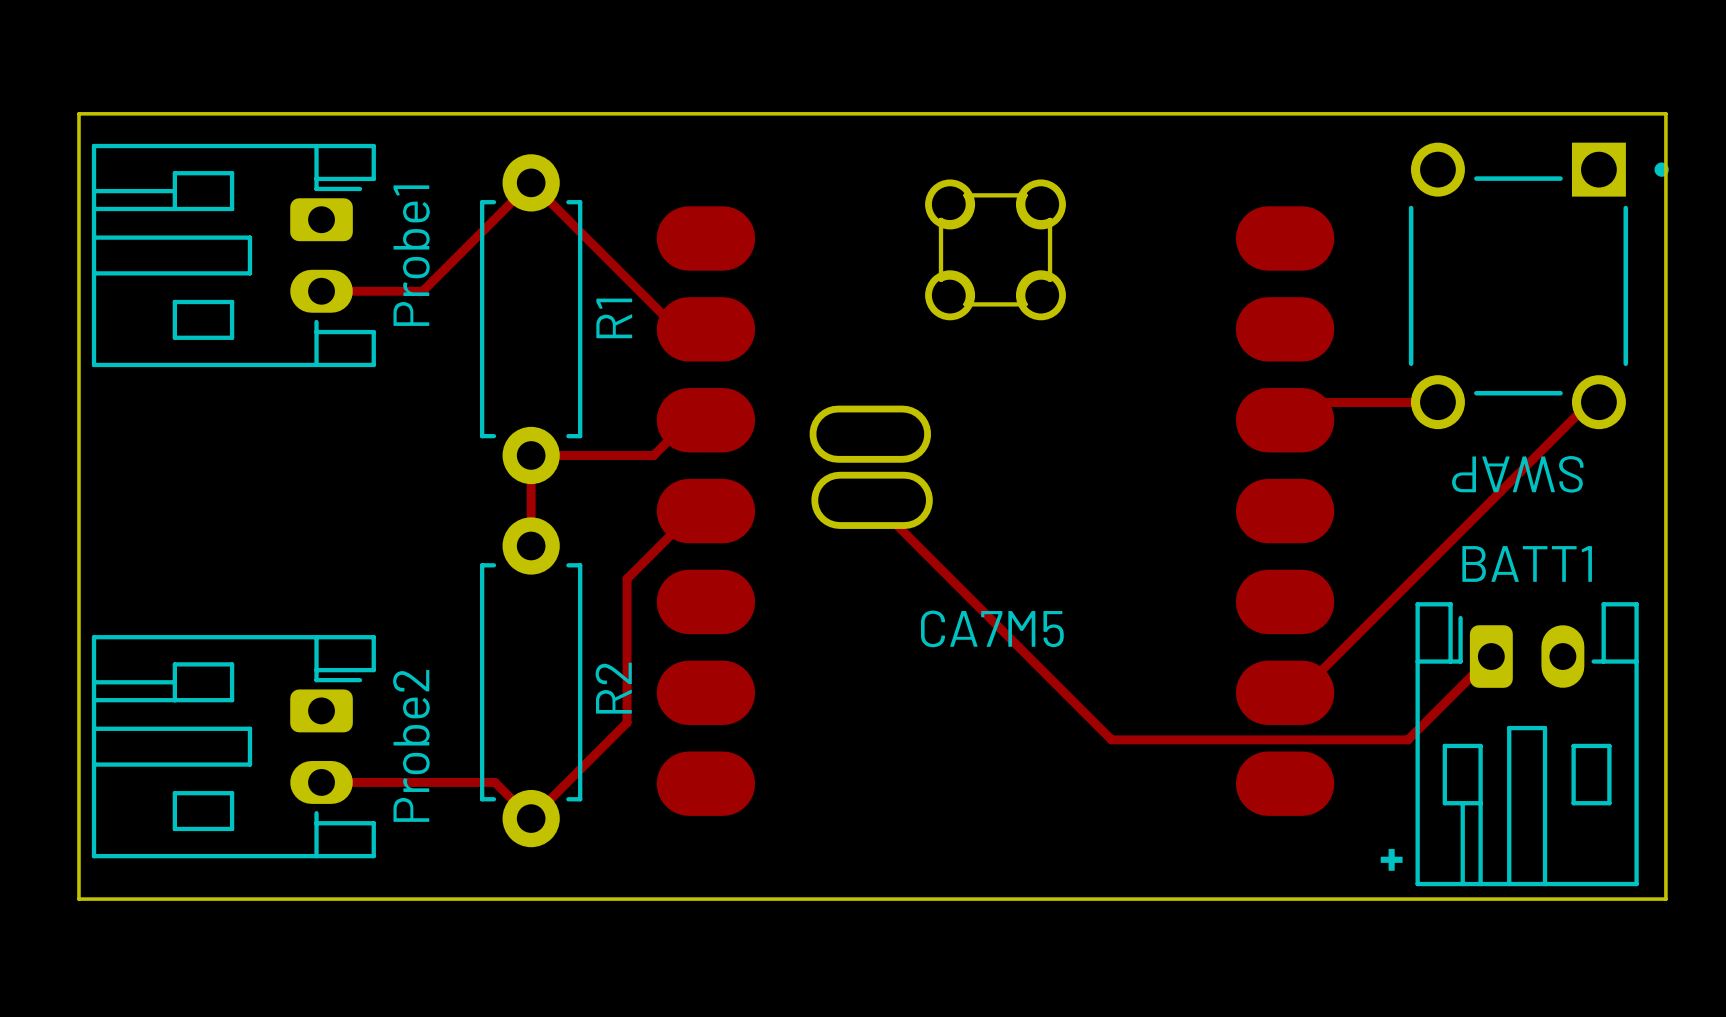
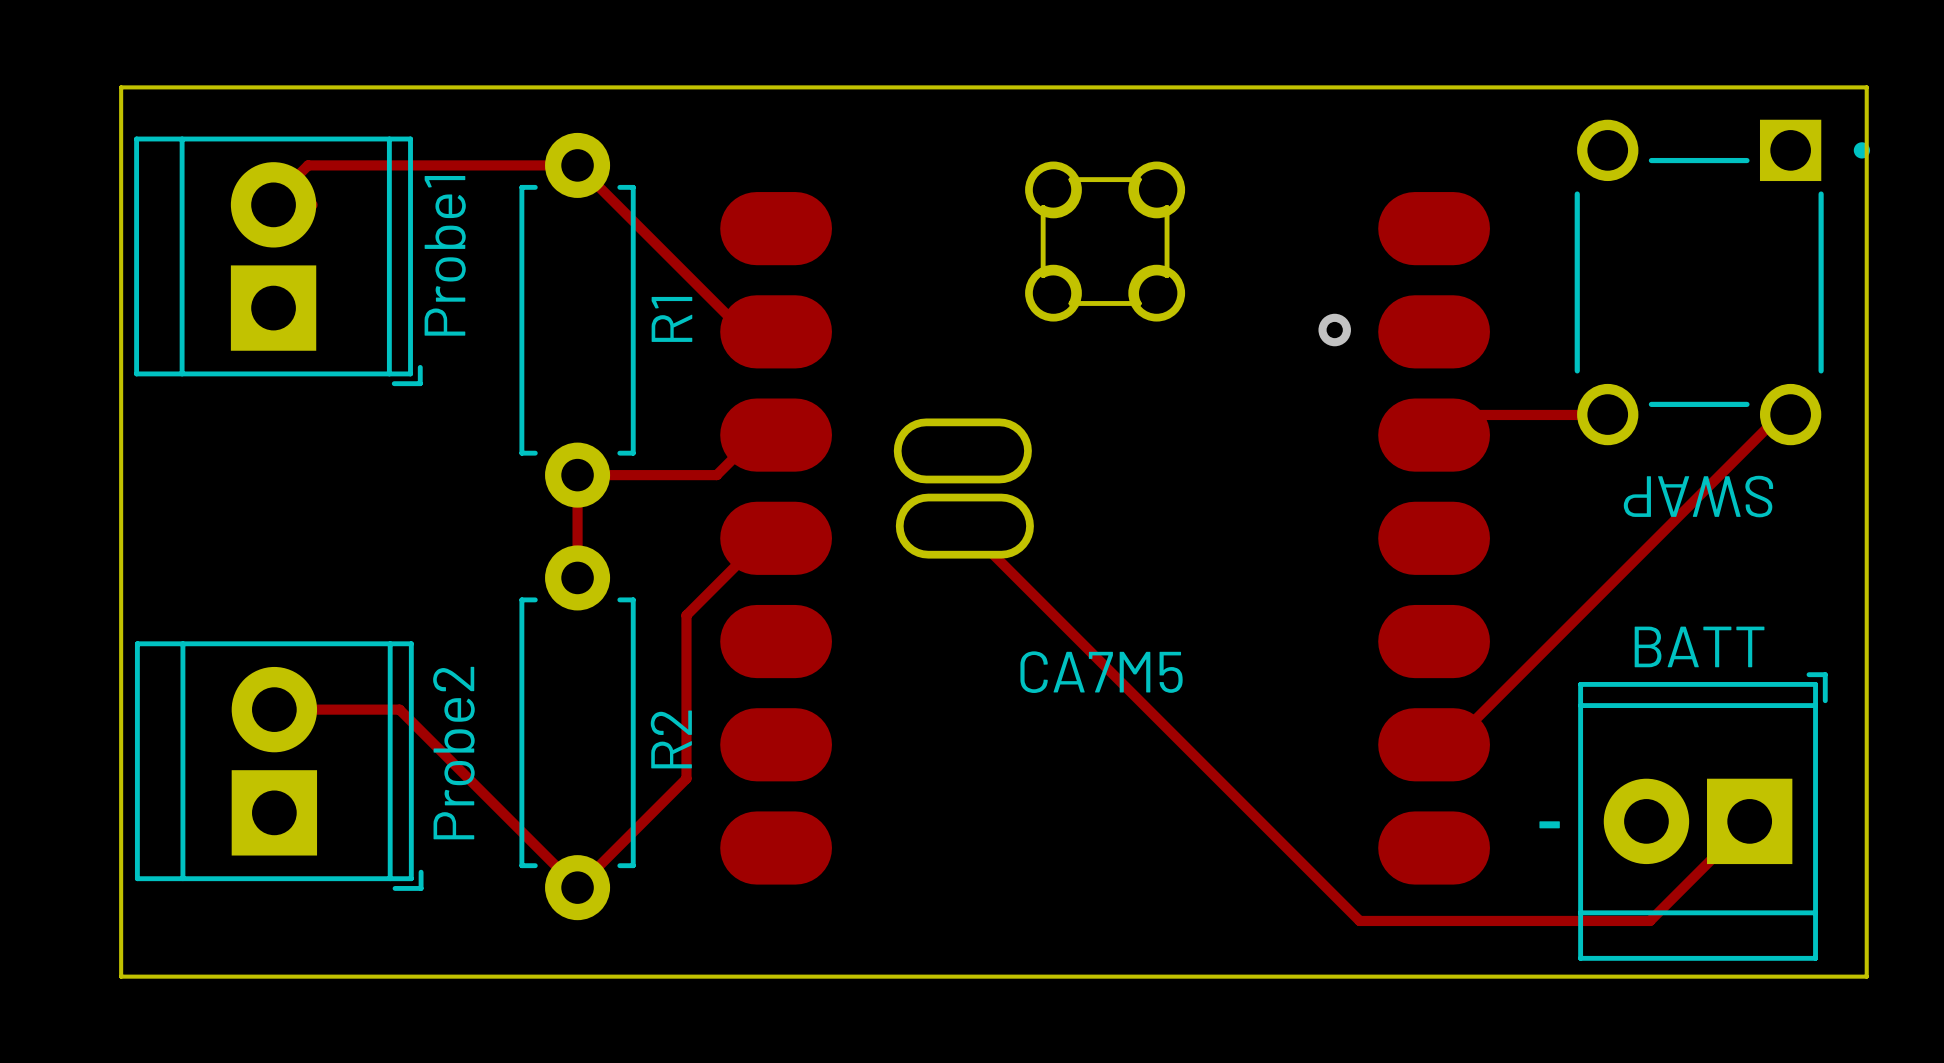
board edge: (1665, 113) (78, 113) (78, 899) (1665, 899) (1665, 896) -> (1866, 87) (121, 87) (121, 976) (1866, 976)
Probe1 footprint: [91, 143, 376, 368] -> [134, 136, 423, 387]
track: (531, 182) (422, 291) (321, 291) -> (577, 165) (308, 165) (272, 201)
via: none -> (1334, 330)
Probe2 footprint: [91, 635, 376, 859] -> [134, 641, 424, 891]
track: (1491, 656) (1407, 739) (1111, 739) -> (1749, 821) (1650, 920) (1359, 920) (1236, 798)
BATT1: (1527, 744) -> none
BATT: none -> (1702, 816)
text: none -> - (1549, 824)
track: (321, 782) (495, 782) -> (274, 709) (399, 709) (536, 846)
text: + (1391, 859) -> none

